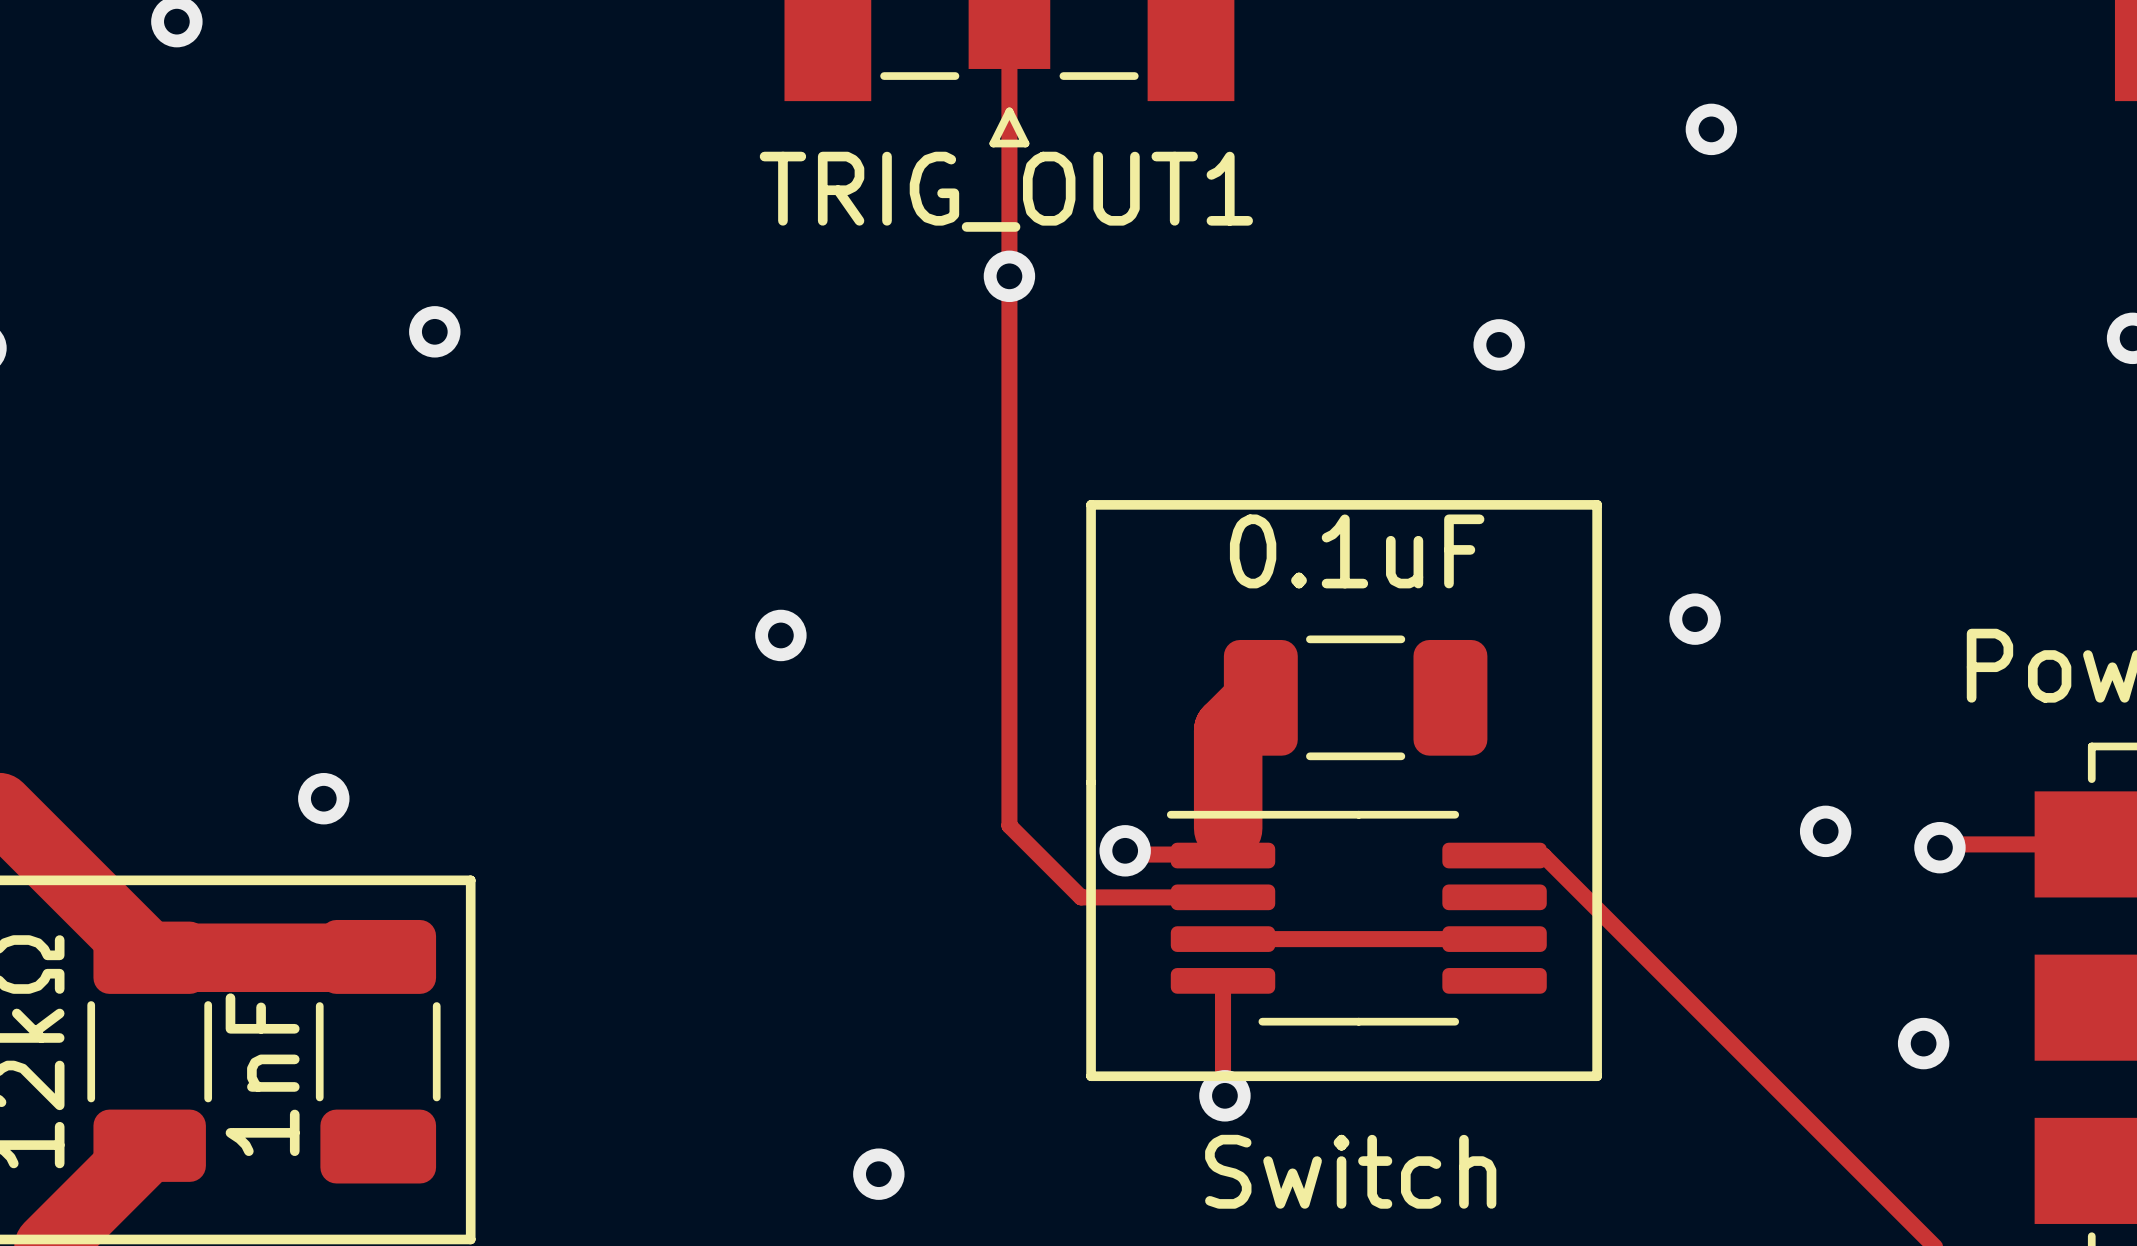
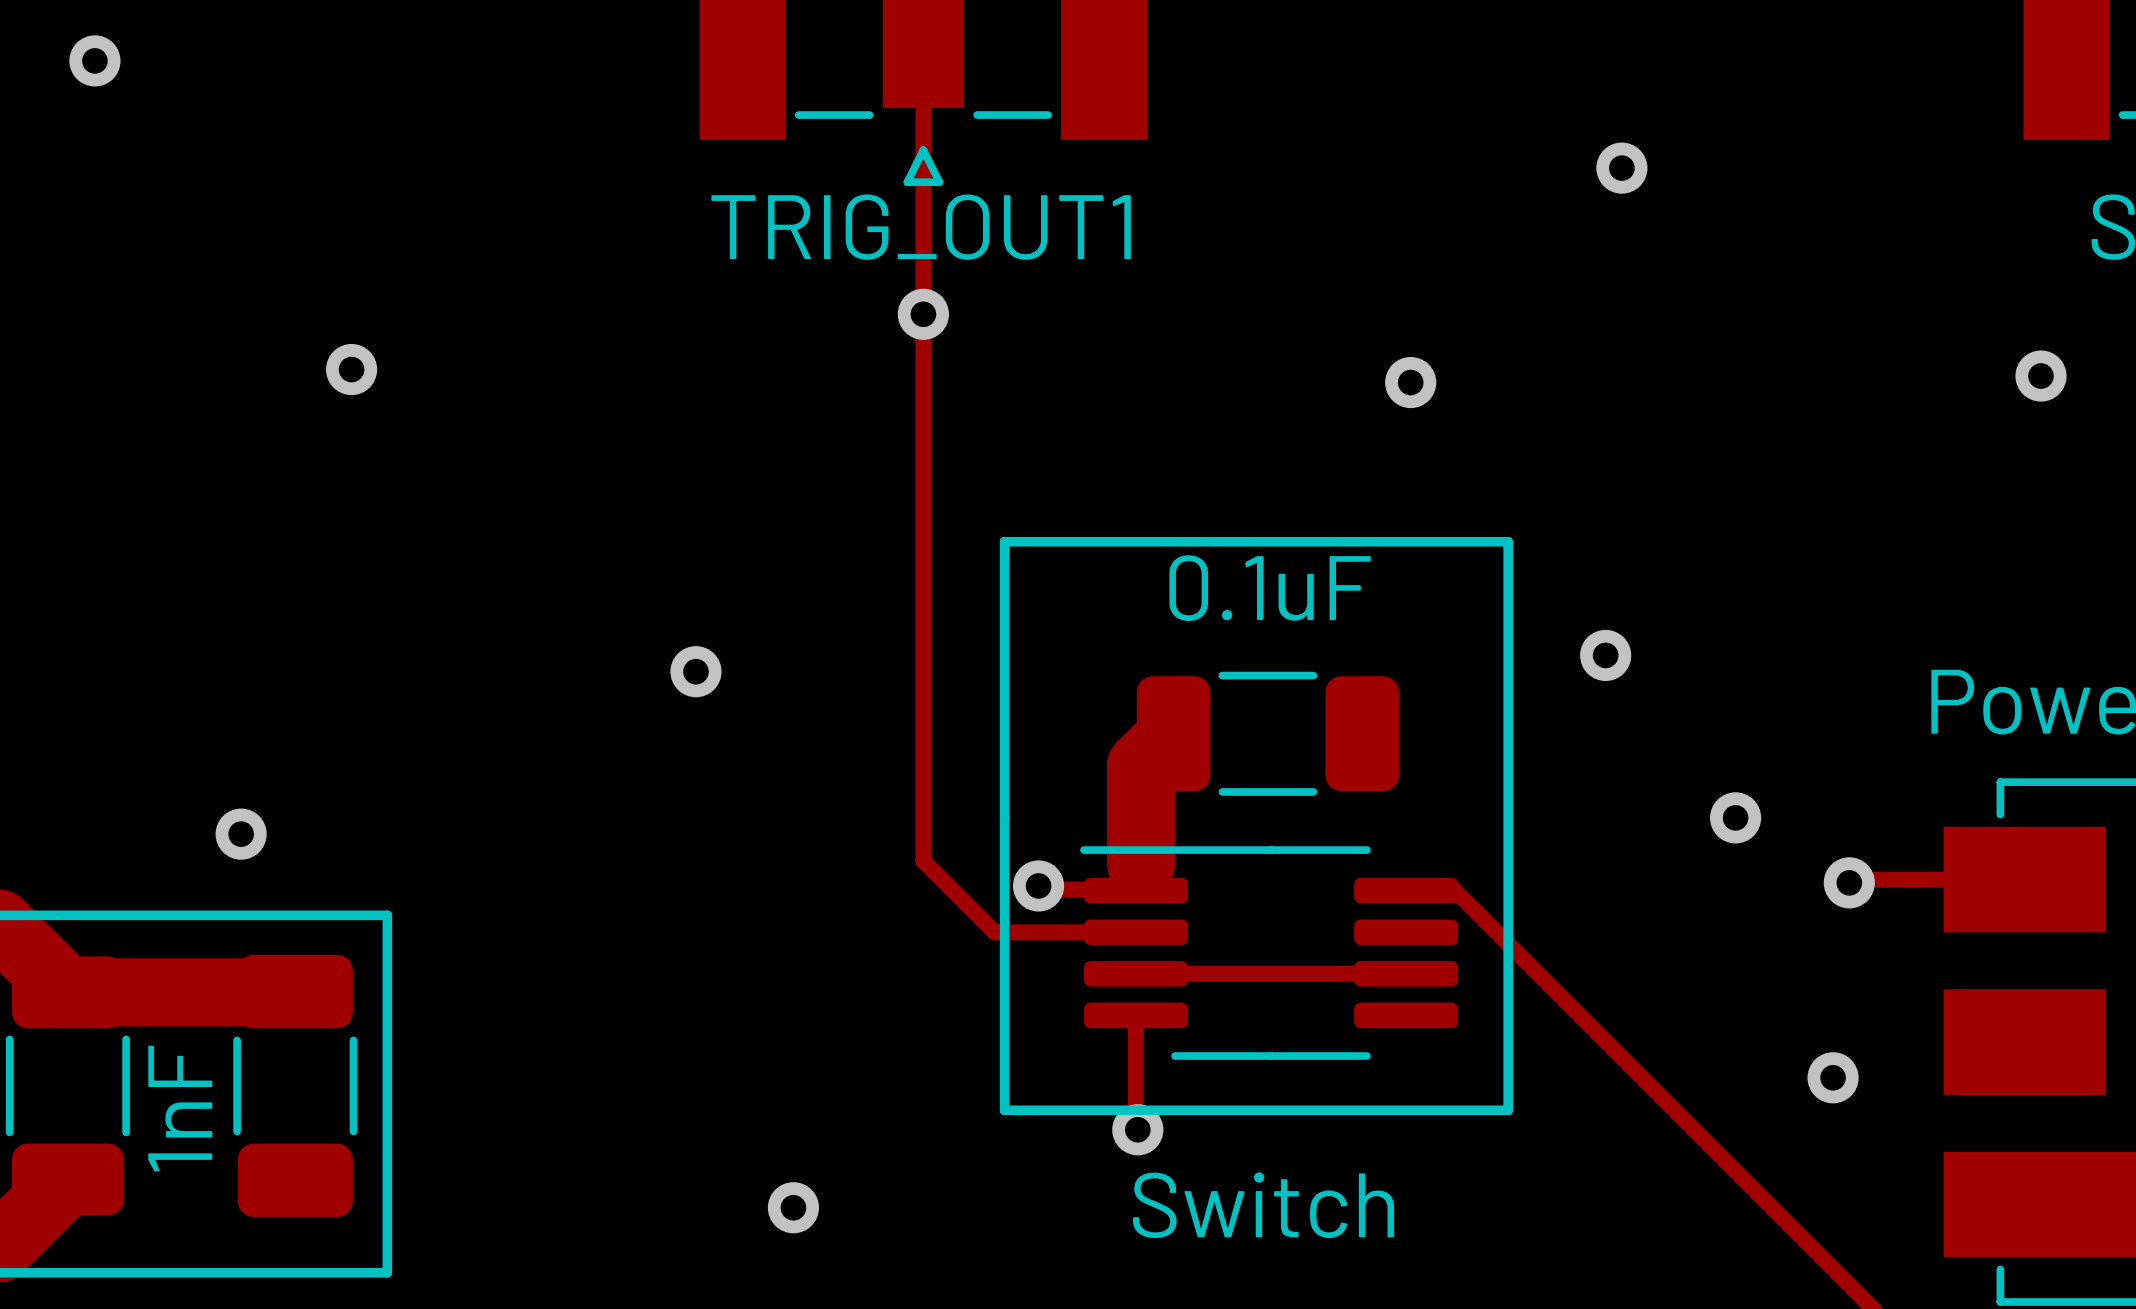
via position: (1825, 831) -> (1735, 817)

